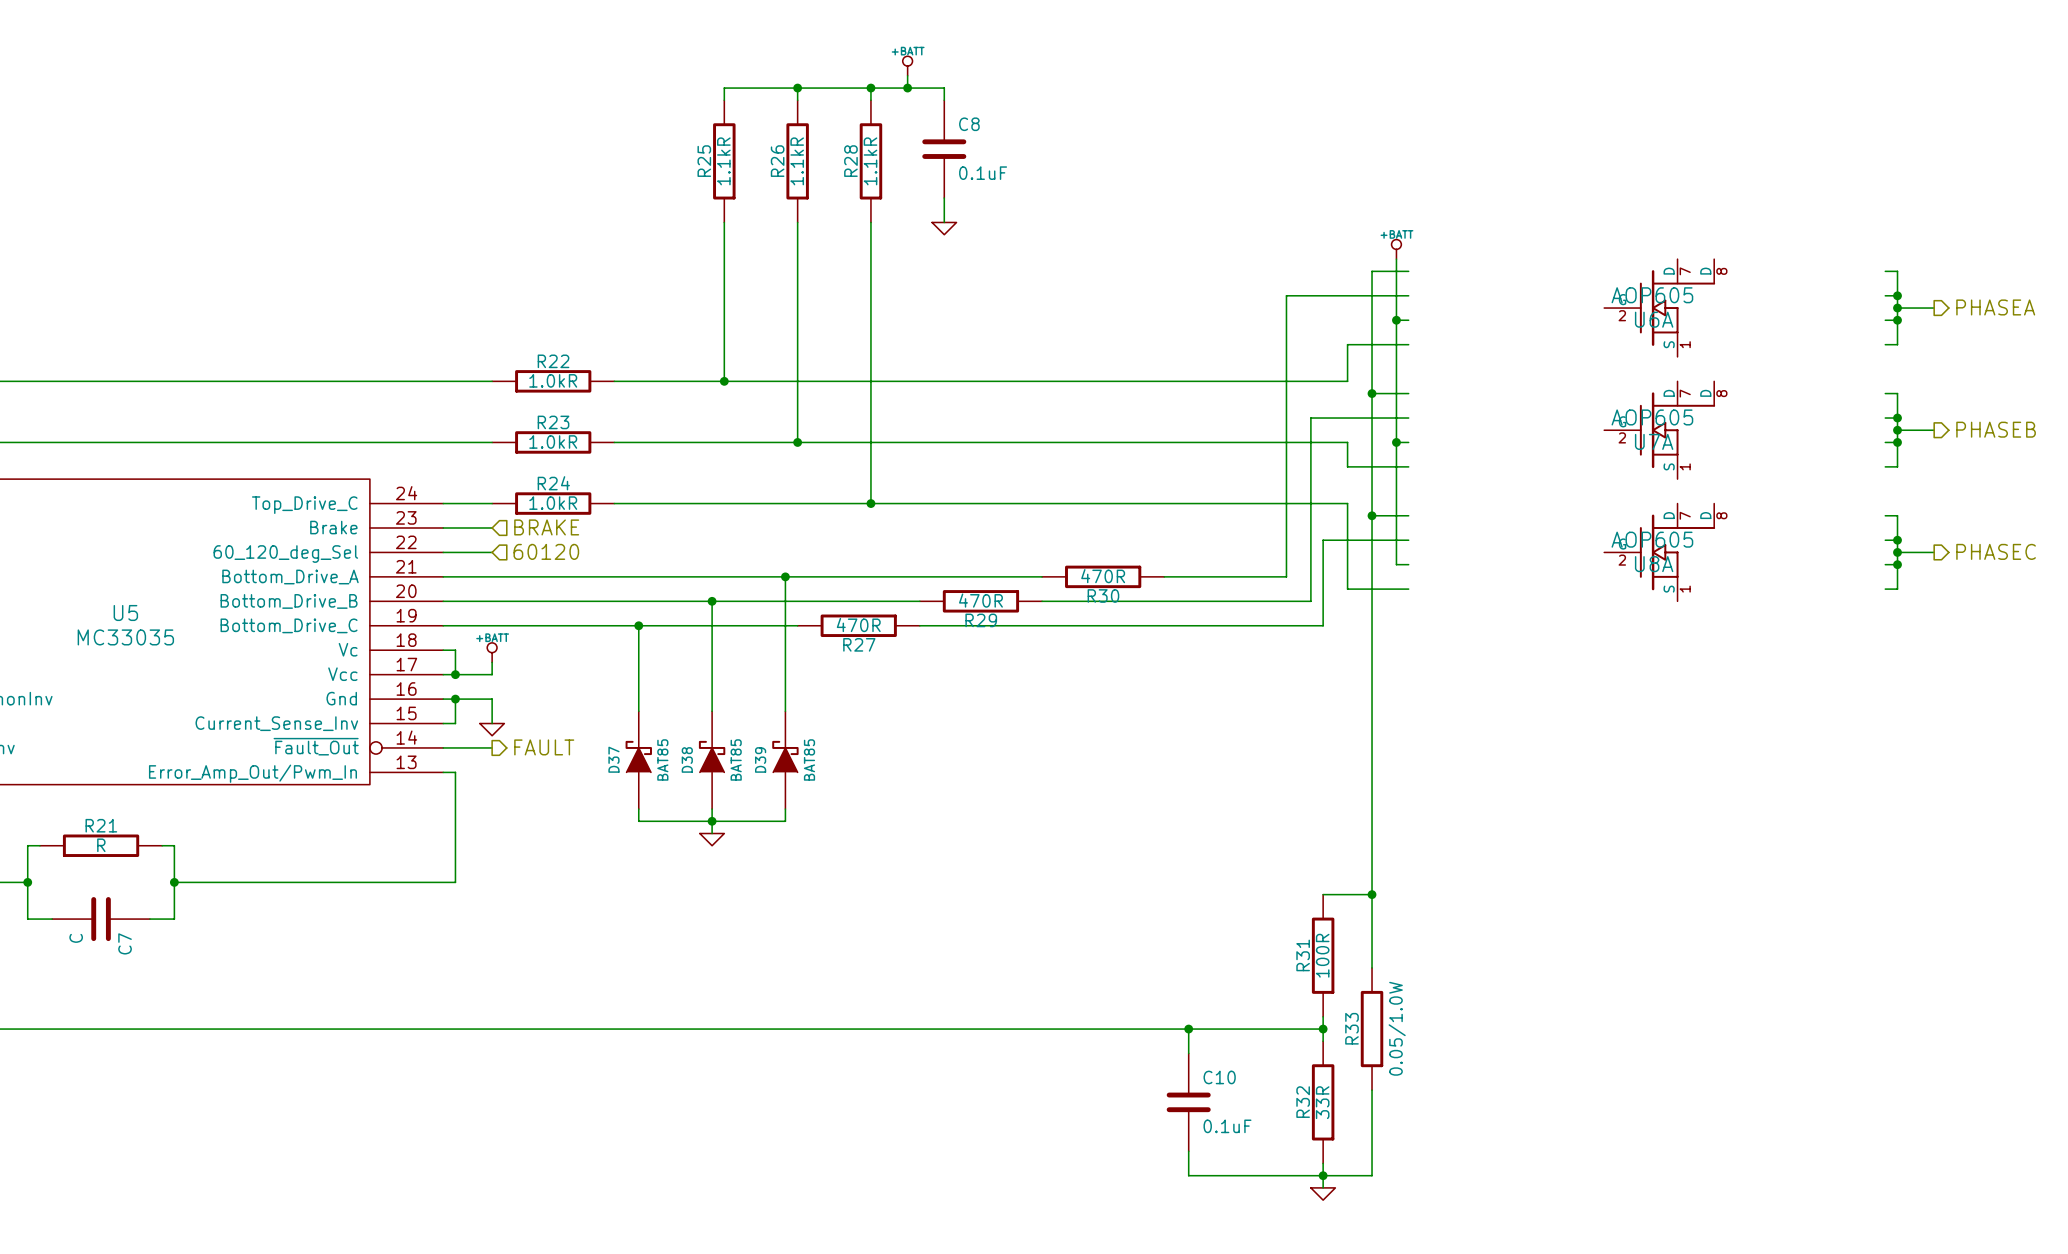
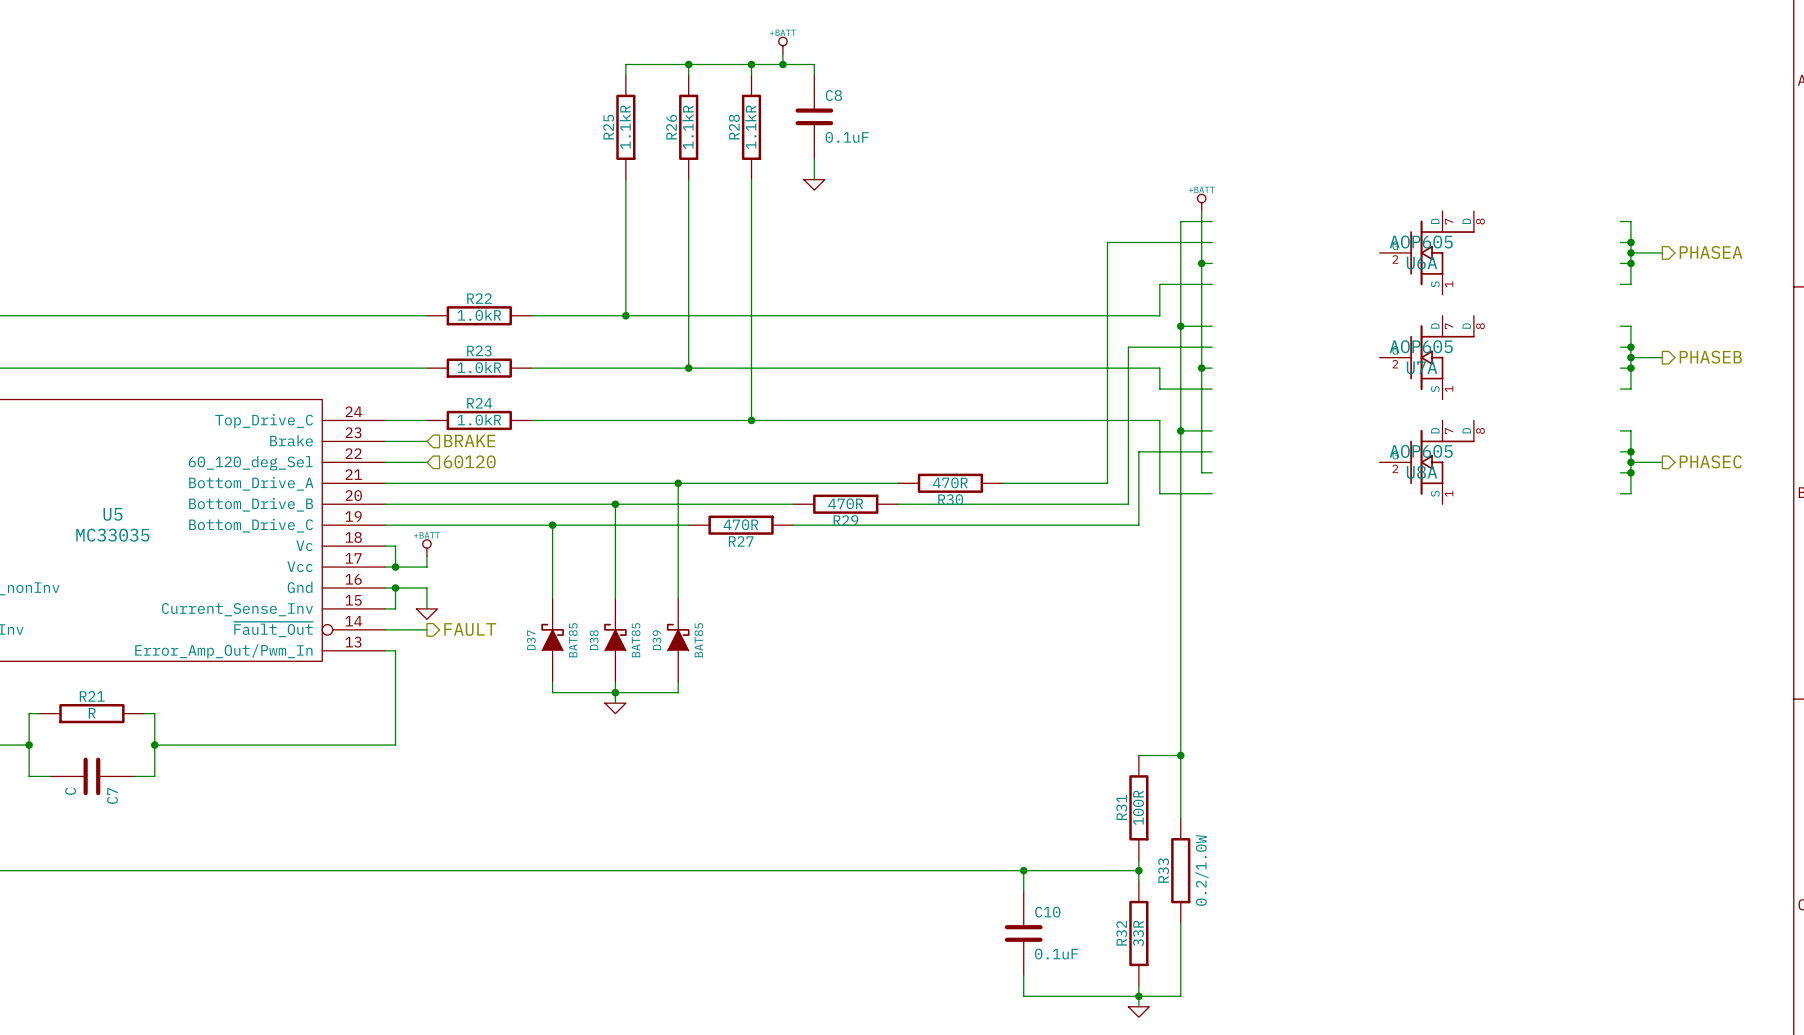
R33 value: 0.05/1.0W (1397, 1028) -> 0.2/1.0W (1201, 870)

